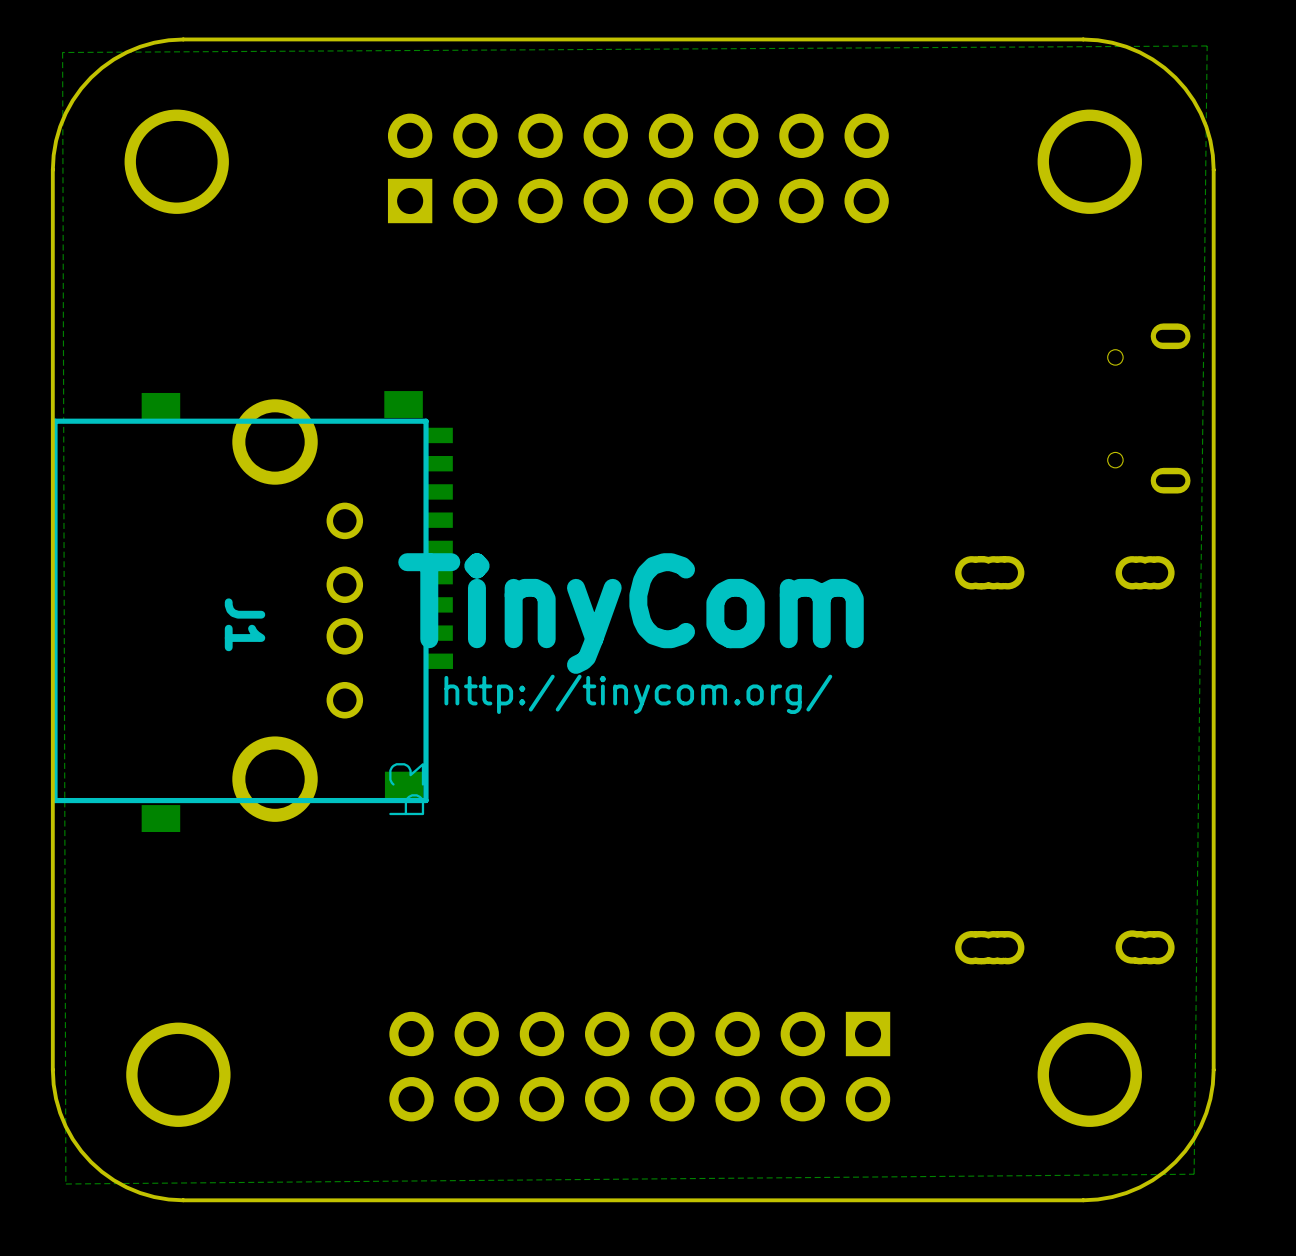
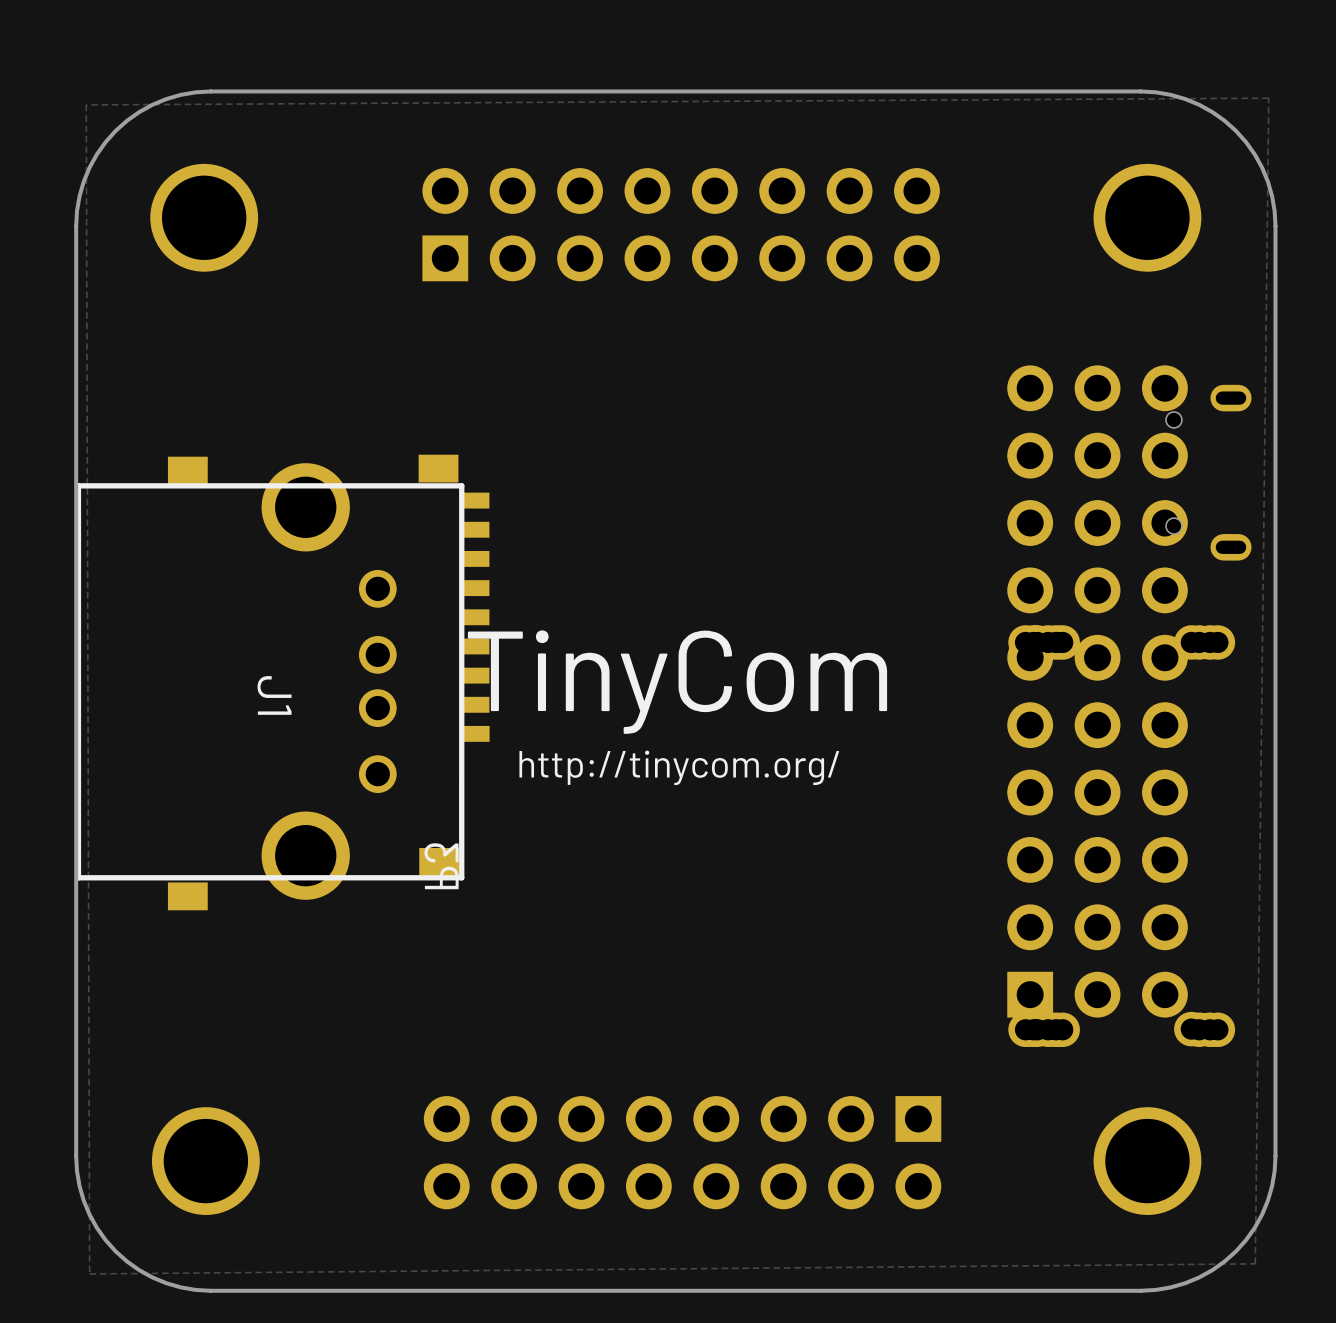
part: none -> (1097, 691)

